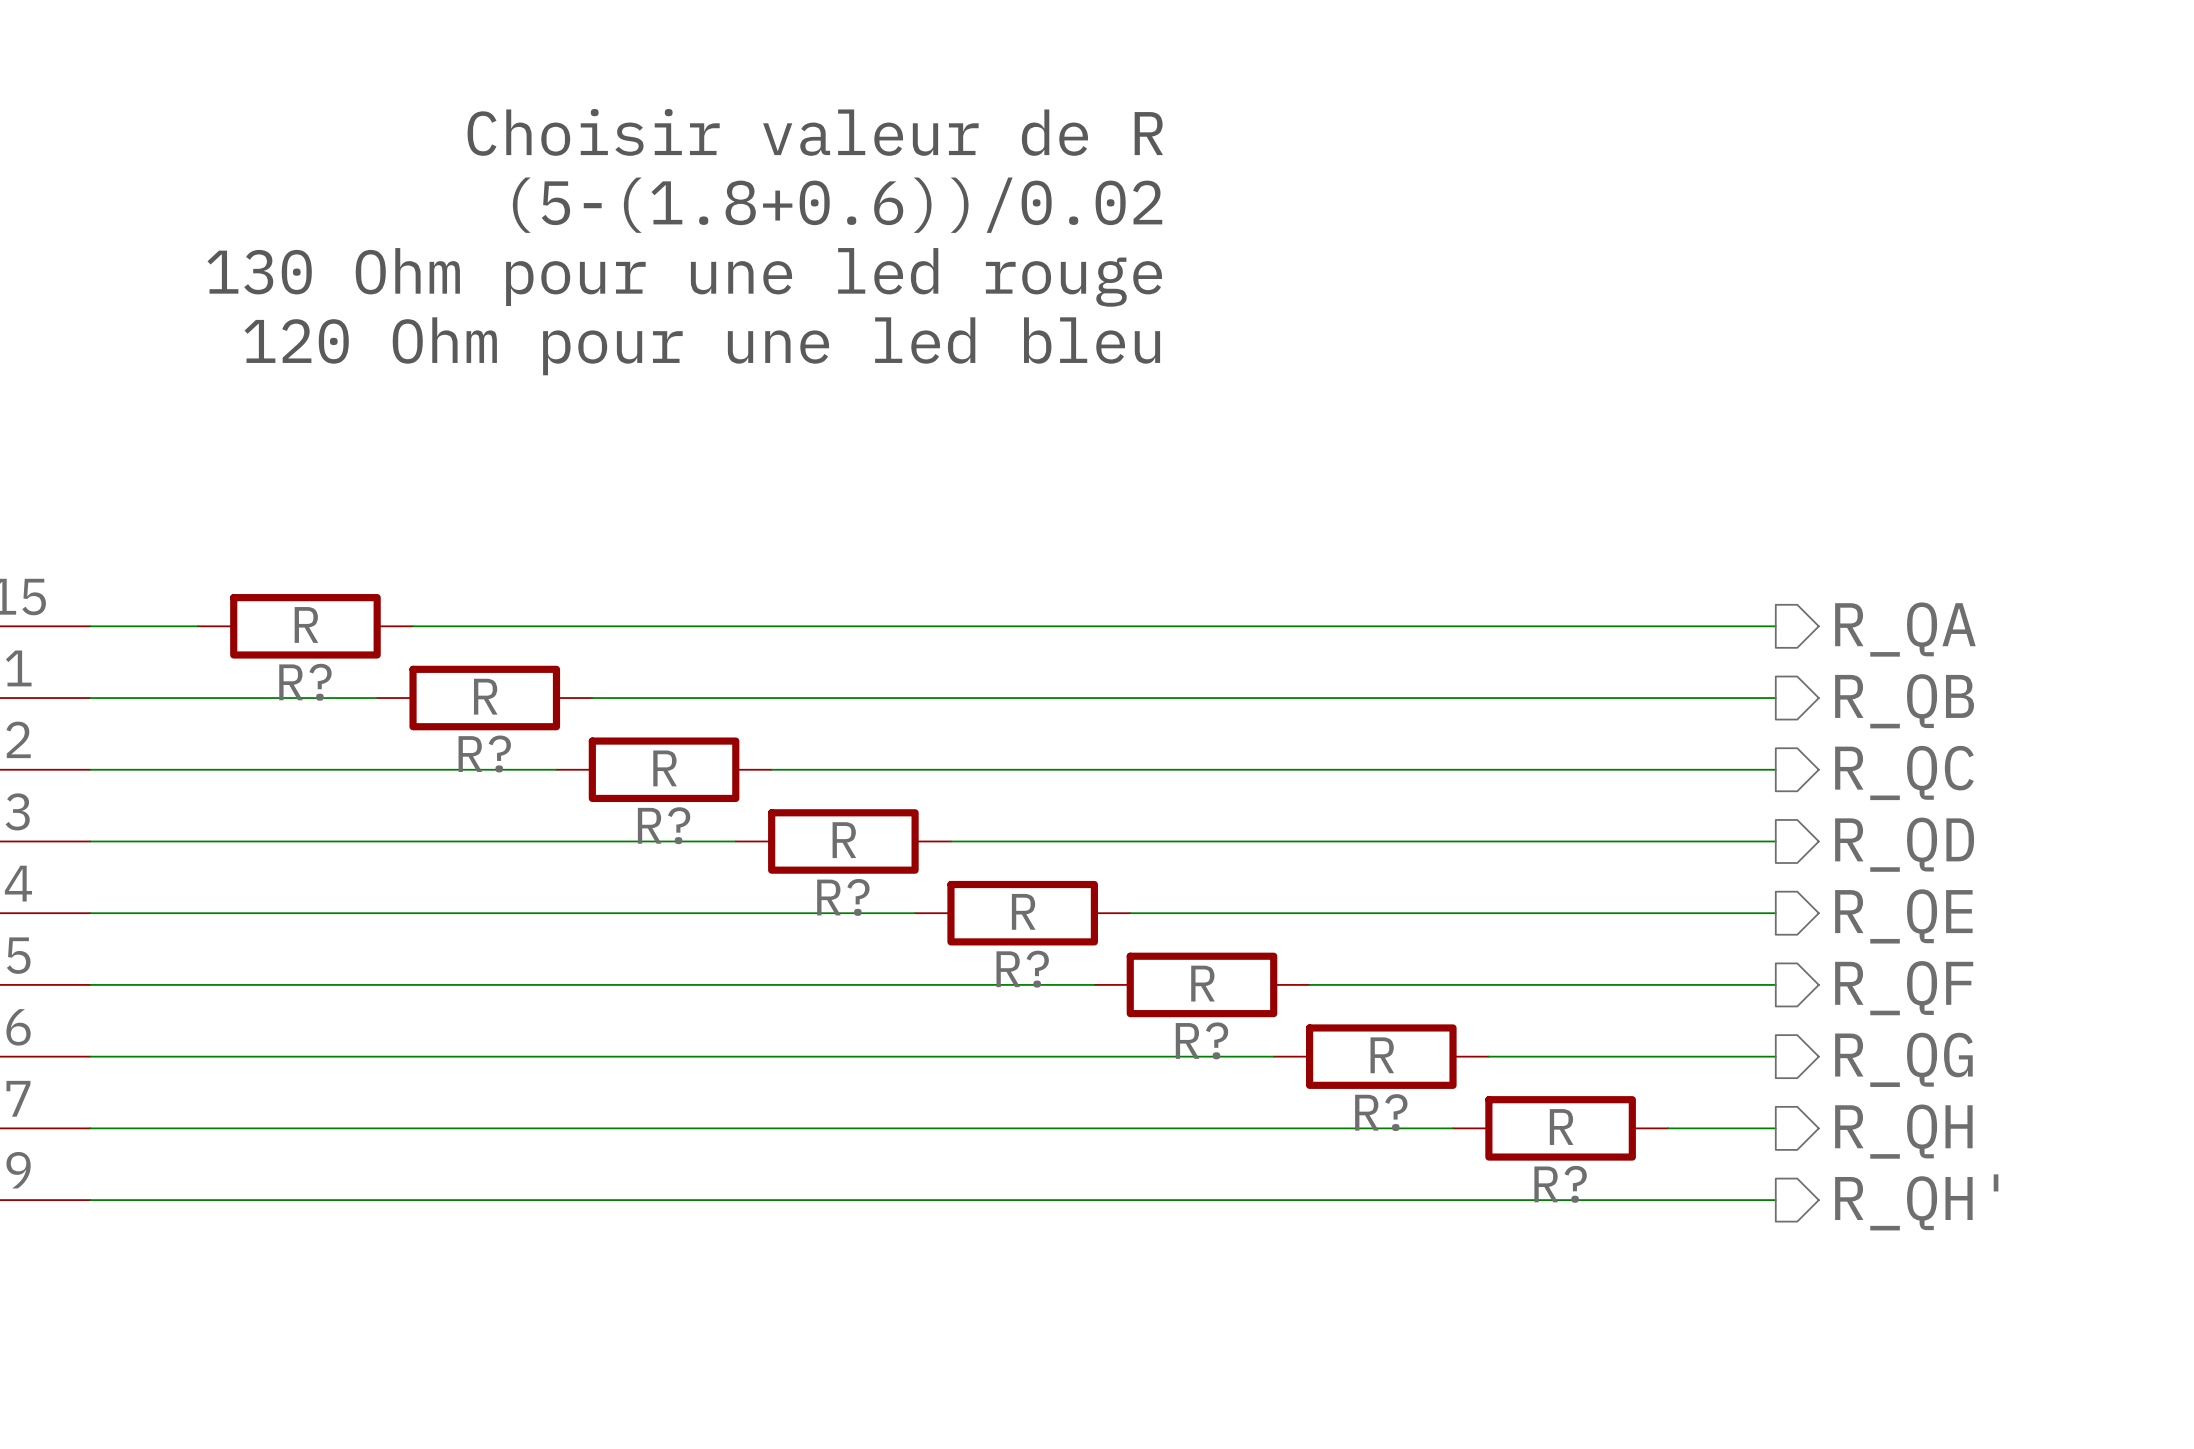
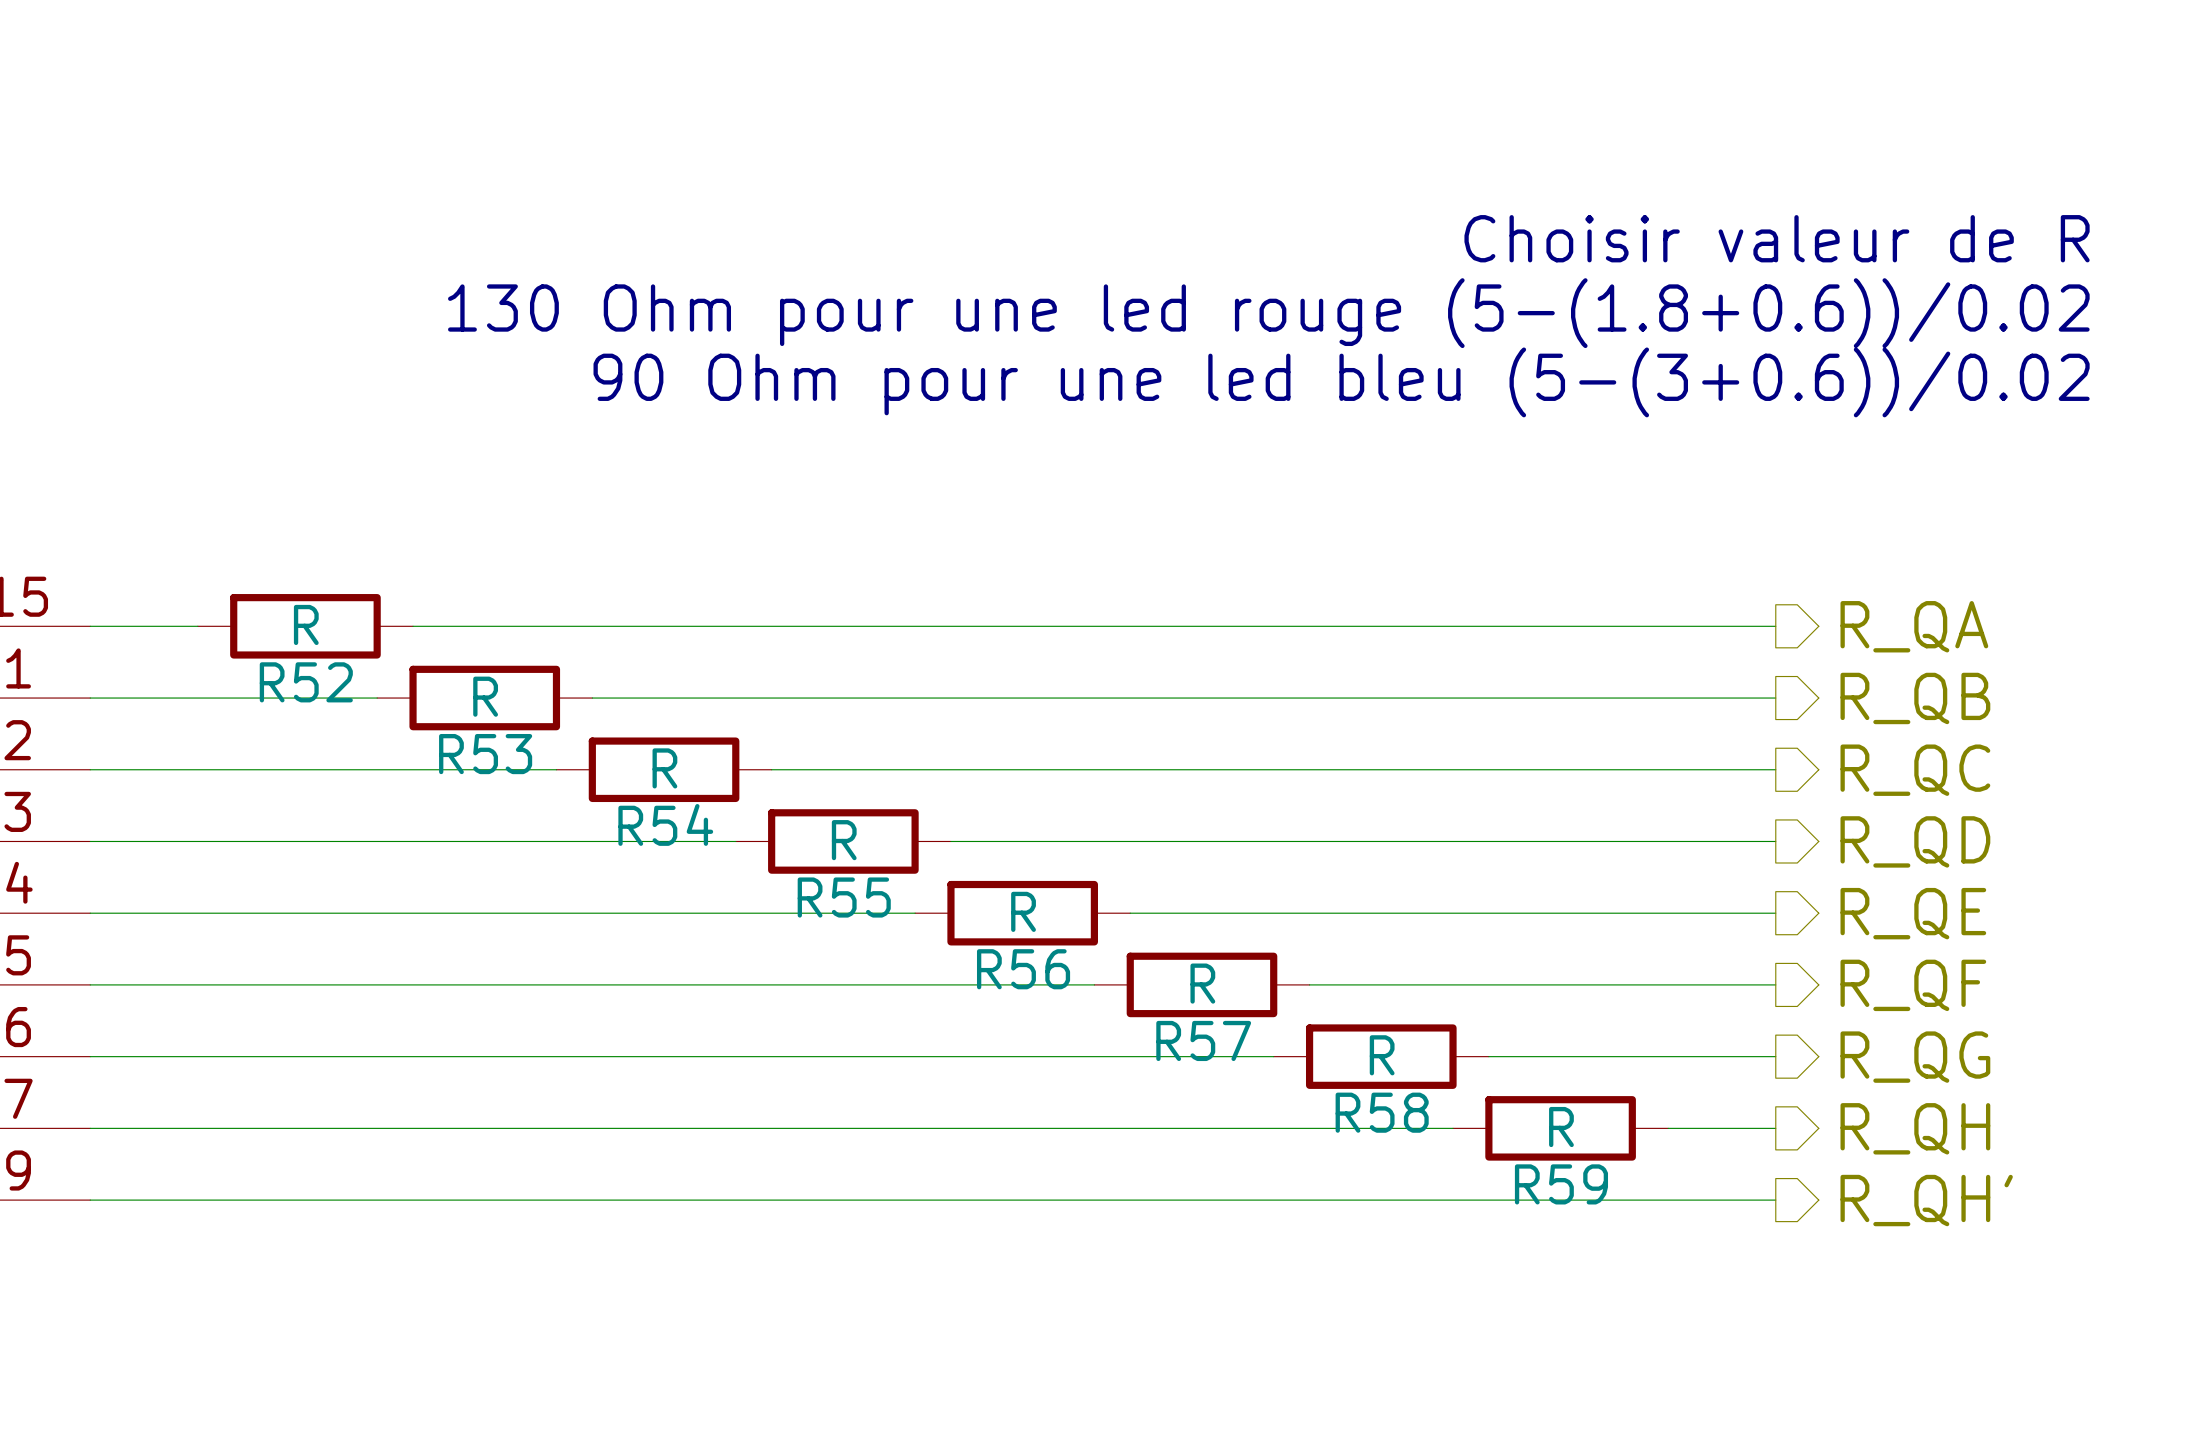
text: Choisir valeur de R (815, 132) -> none
text: (5-(1.8+0.6))/0.02 (837, 205) -> none
text: none -> Choisir valeur de R (1777, 238)
text: 130 Ohm pour une led rouge (684, 277) -> none
text: none -> 130 Ohm pour une led rouge (5-(1.8+0.6))/0.02 (1268, 313)
text: 120 Ohm pour une led bleu (702, 346) -> none
text: none -> 90 Ohm pour une led bleu (5-(3+0.6))/0.02 (1341, 382)
R? name: R? (305, 682) -> R52 (306, 682)
R? name: R? (484, 753) -> R53 (485, 754)
R? name: R? (664, 825) -> R54 (665, 824)
R? name: R? (843, 897) -> R55 (844, 897)
R? name: R? (1022, 969) -> R56 (1023, 969)
R? name: R? (1201, 1040) -> R57 (1203, 1040)
R? name: R? (1381, 1112) -> R58 (1382, 1112)
R? name: R? (1560, 1184) -> R59 (1561, 1184)

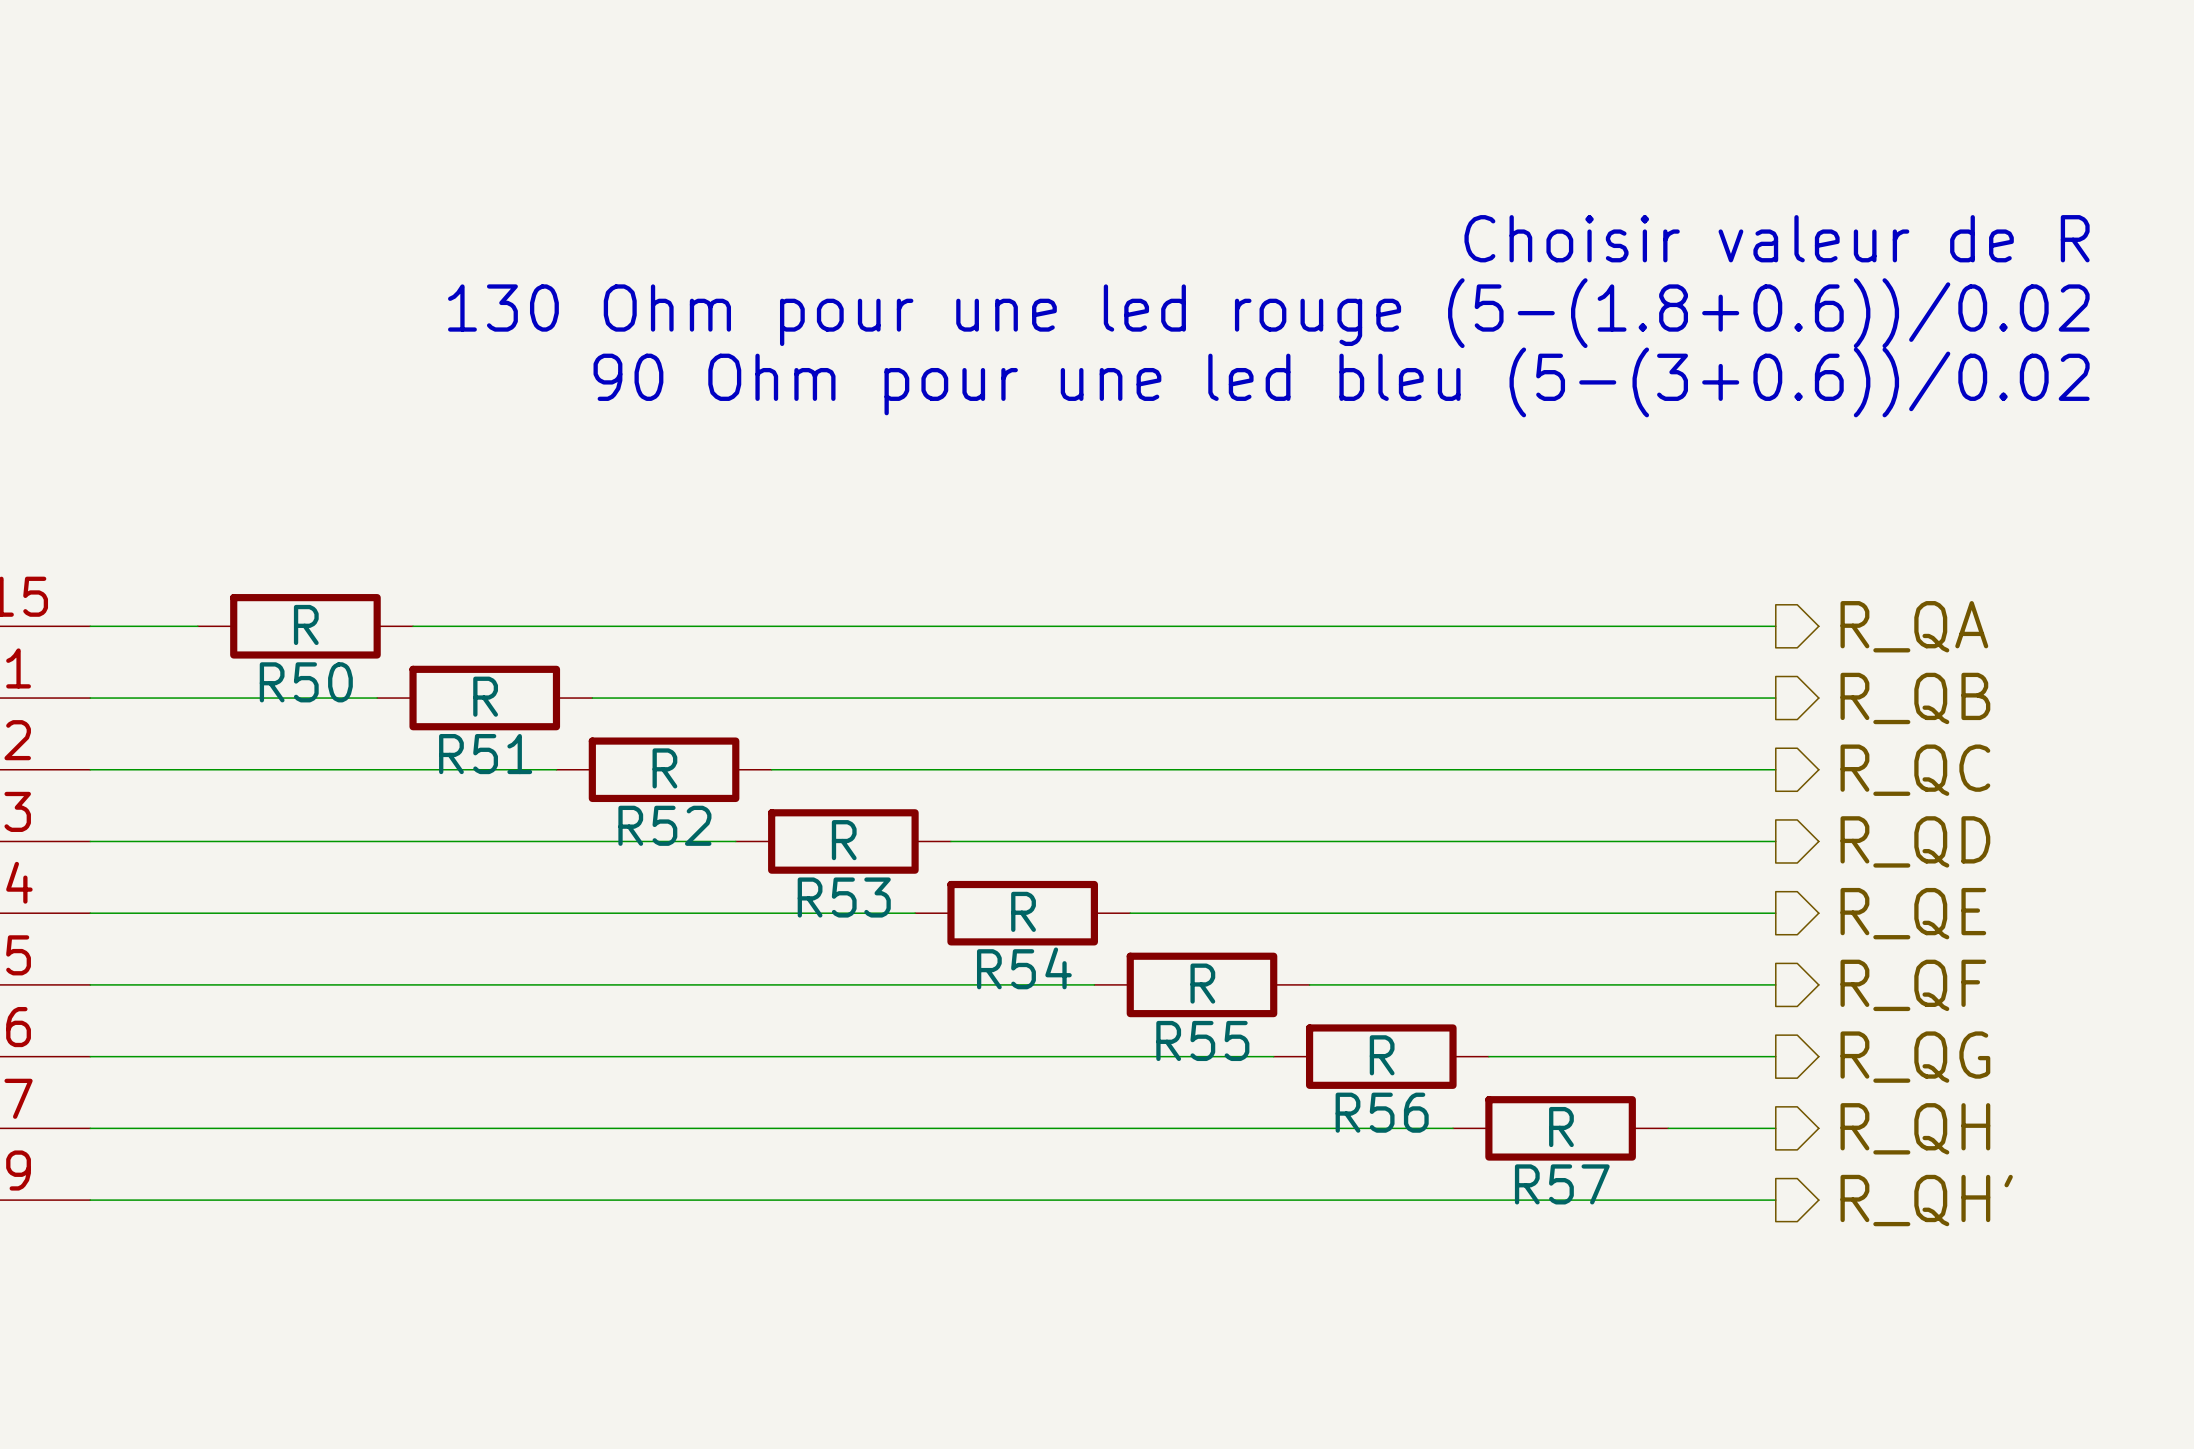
R52 name: R52 (306, 682) -> R50 (306, 682)
R53 name: R53 (485, 754) -> R51 (485, 754)
R54 name: R54 (665, 824) -> R52 (664, 825)
R55 name: R55 (844, 897) -> R53 (844, 897)
R56 name: R56 (1023, 969) -> R54 (1024, 968)
R57 name: R57 (1203, 1040) -> R55 (1202, 1040)
R58 name: R58 (1382, 1112) -> R56 (1382, 1112)
R59 name: R59 (1561, 1184) -> R57 (1562, 1184)

